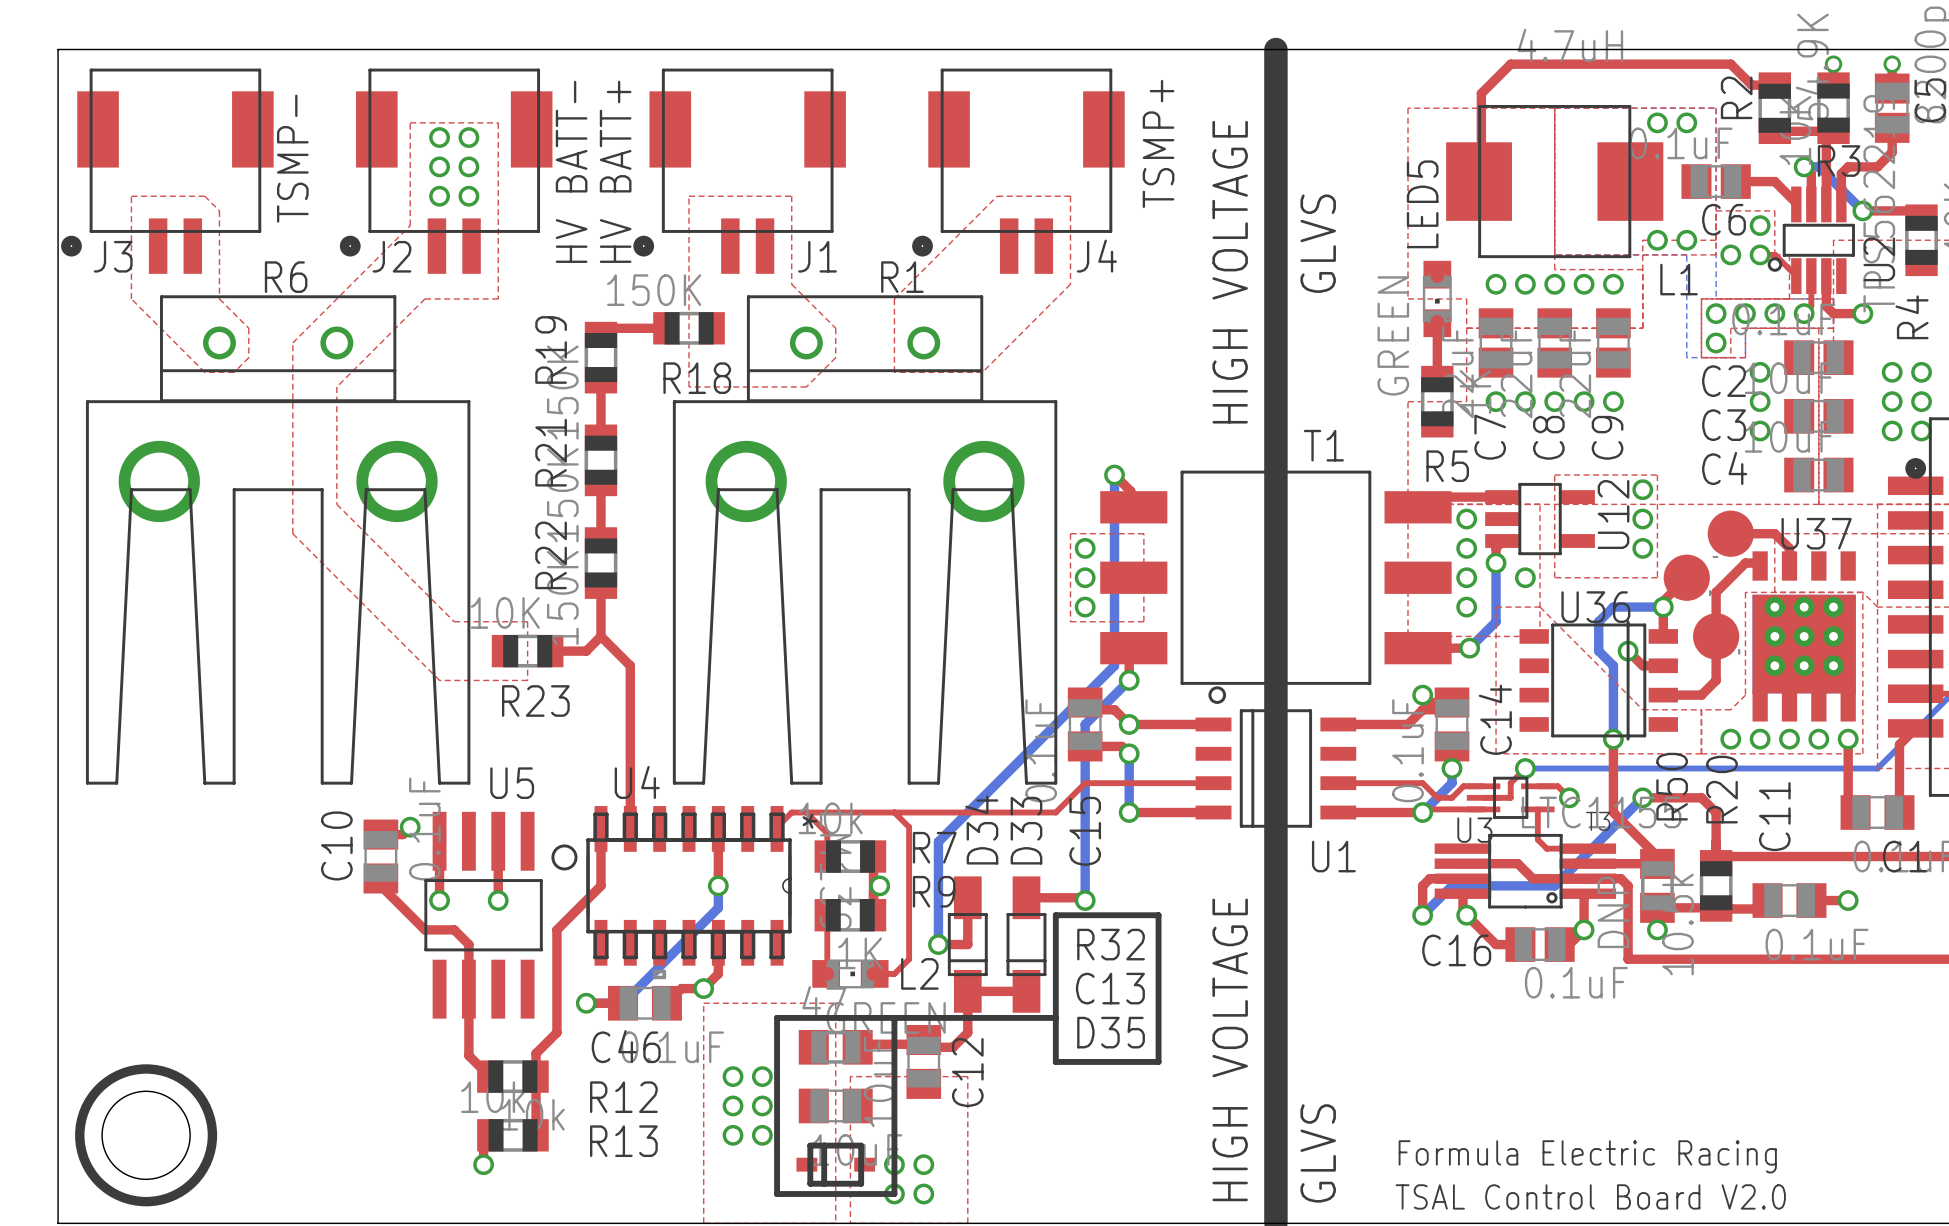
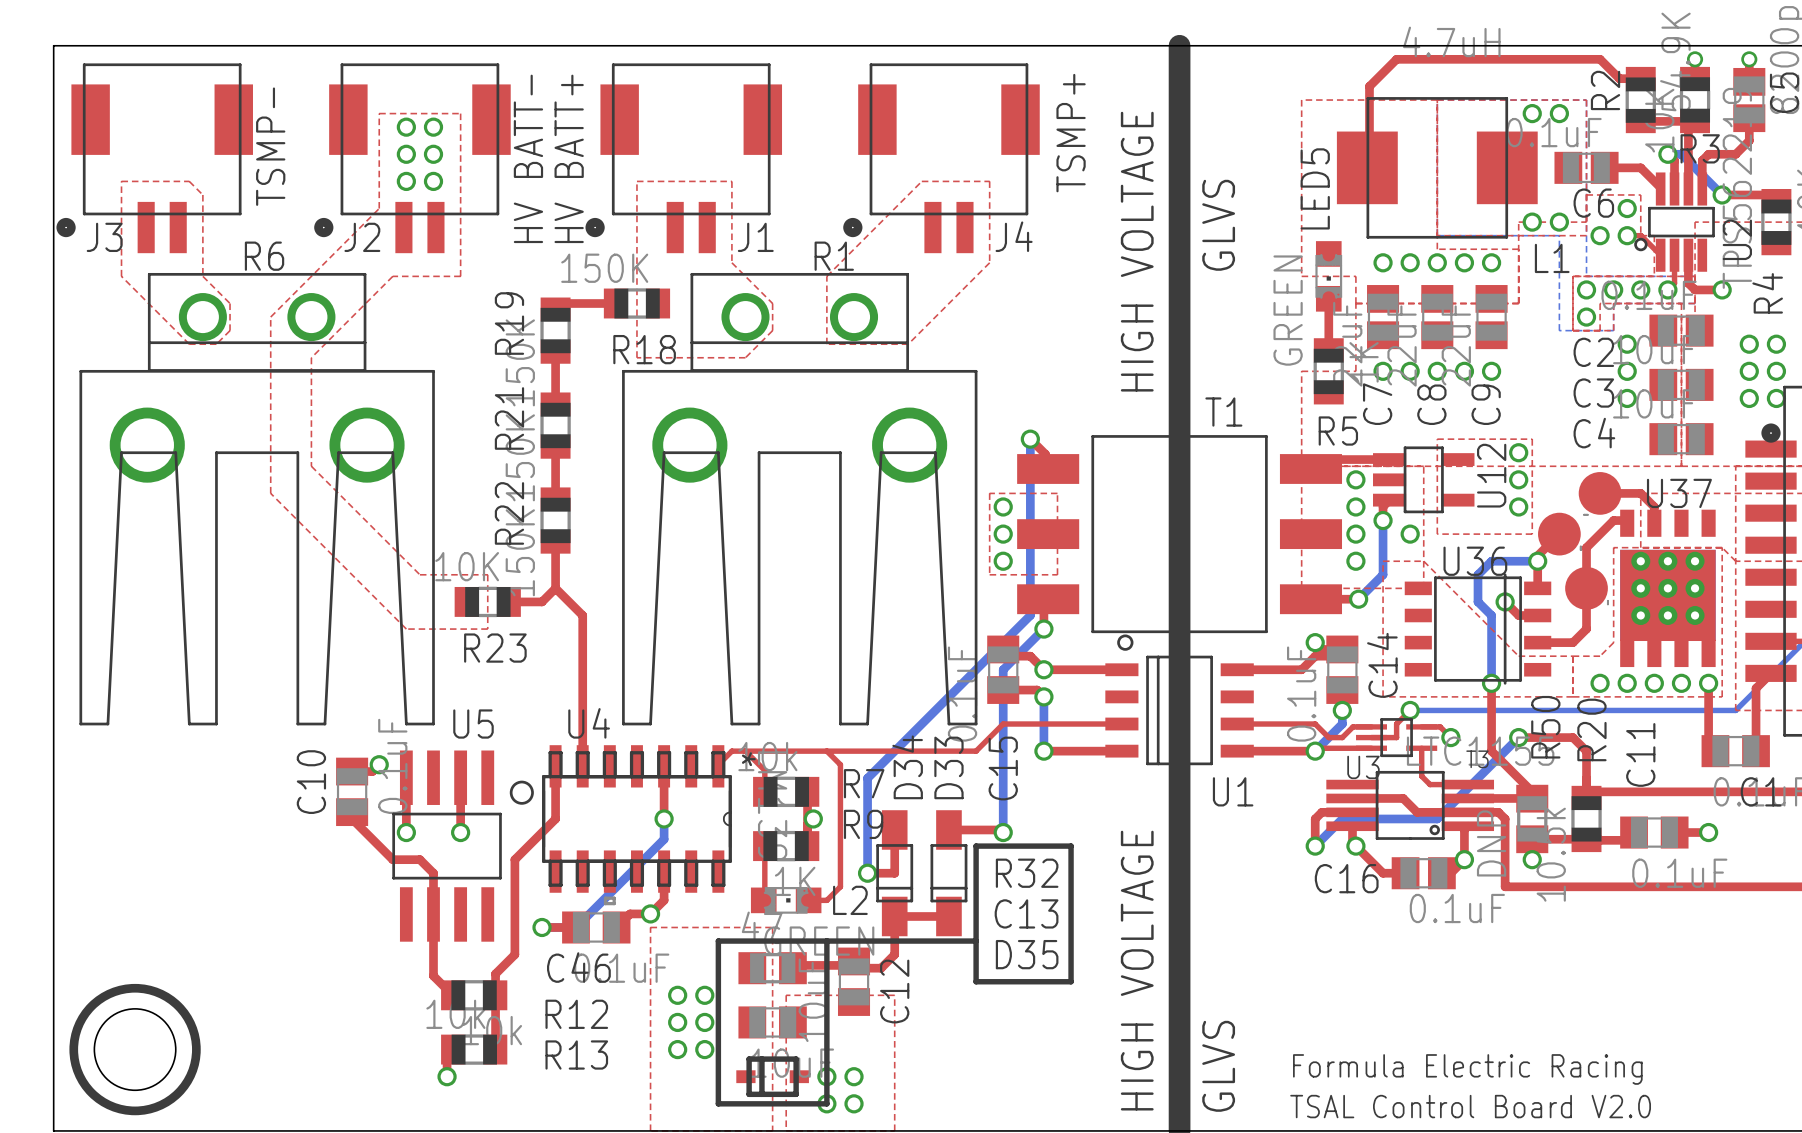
R6 footprint: [160, 295, 397, 403] -> [147, 272, 367, 372]
R1 footprint: [746, 295, 984, 403] -> [690, 272, 909, 372]

